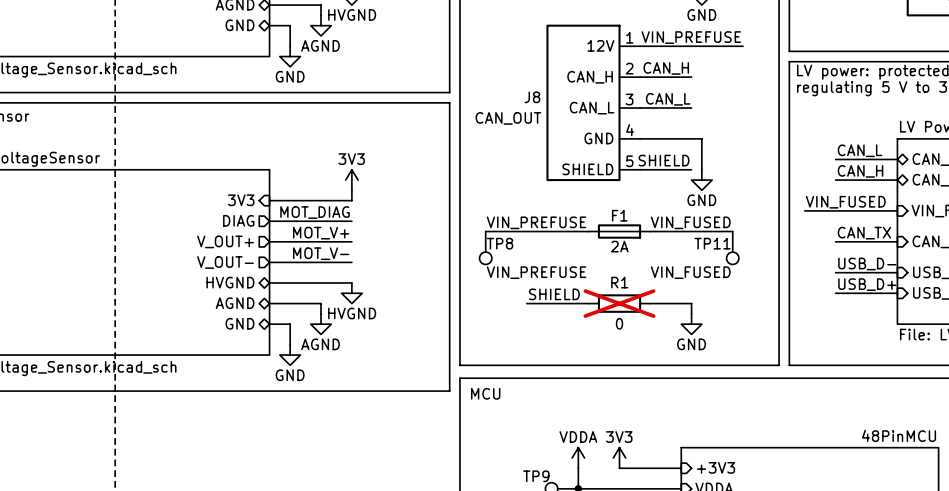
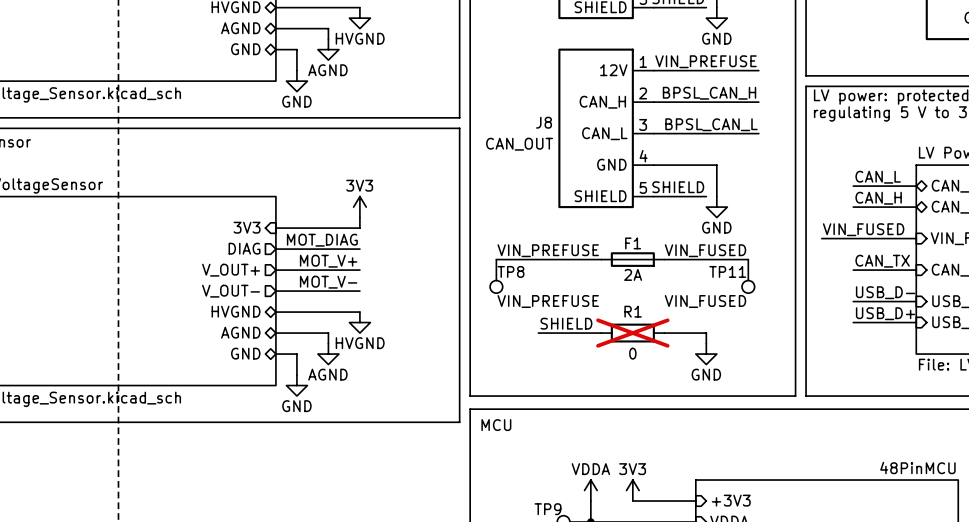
label: CAN_H (666, 68) -> BPSL_CAN_H (709, 93)
wire: none -> (706, 102) (758, 102)
label: CAN_L (668, 99) -> BPSL_CAN_L (711, 124)
wire: none -> (706, 133) (758, 133)

